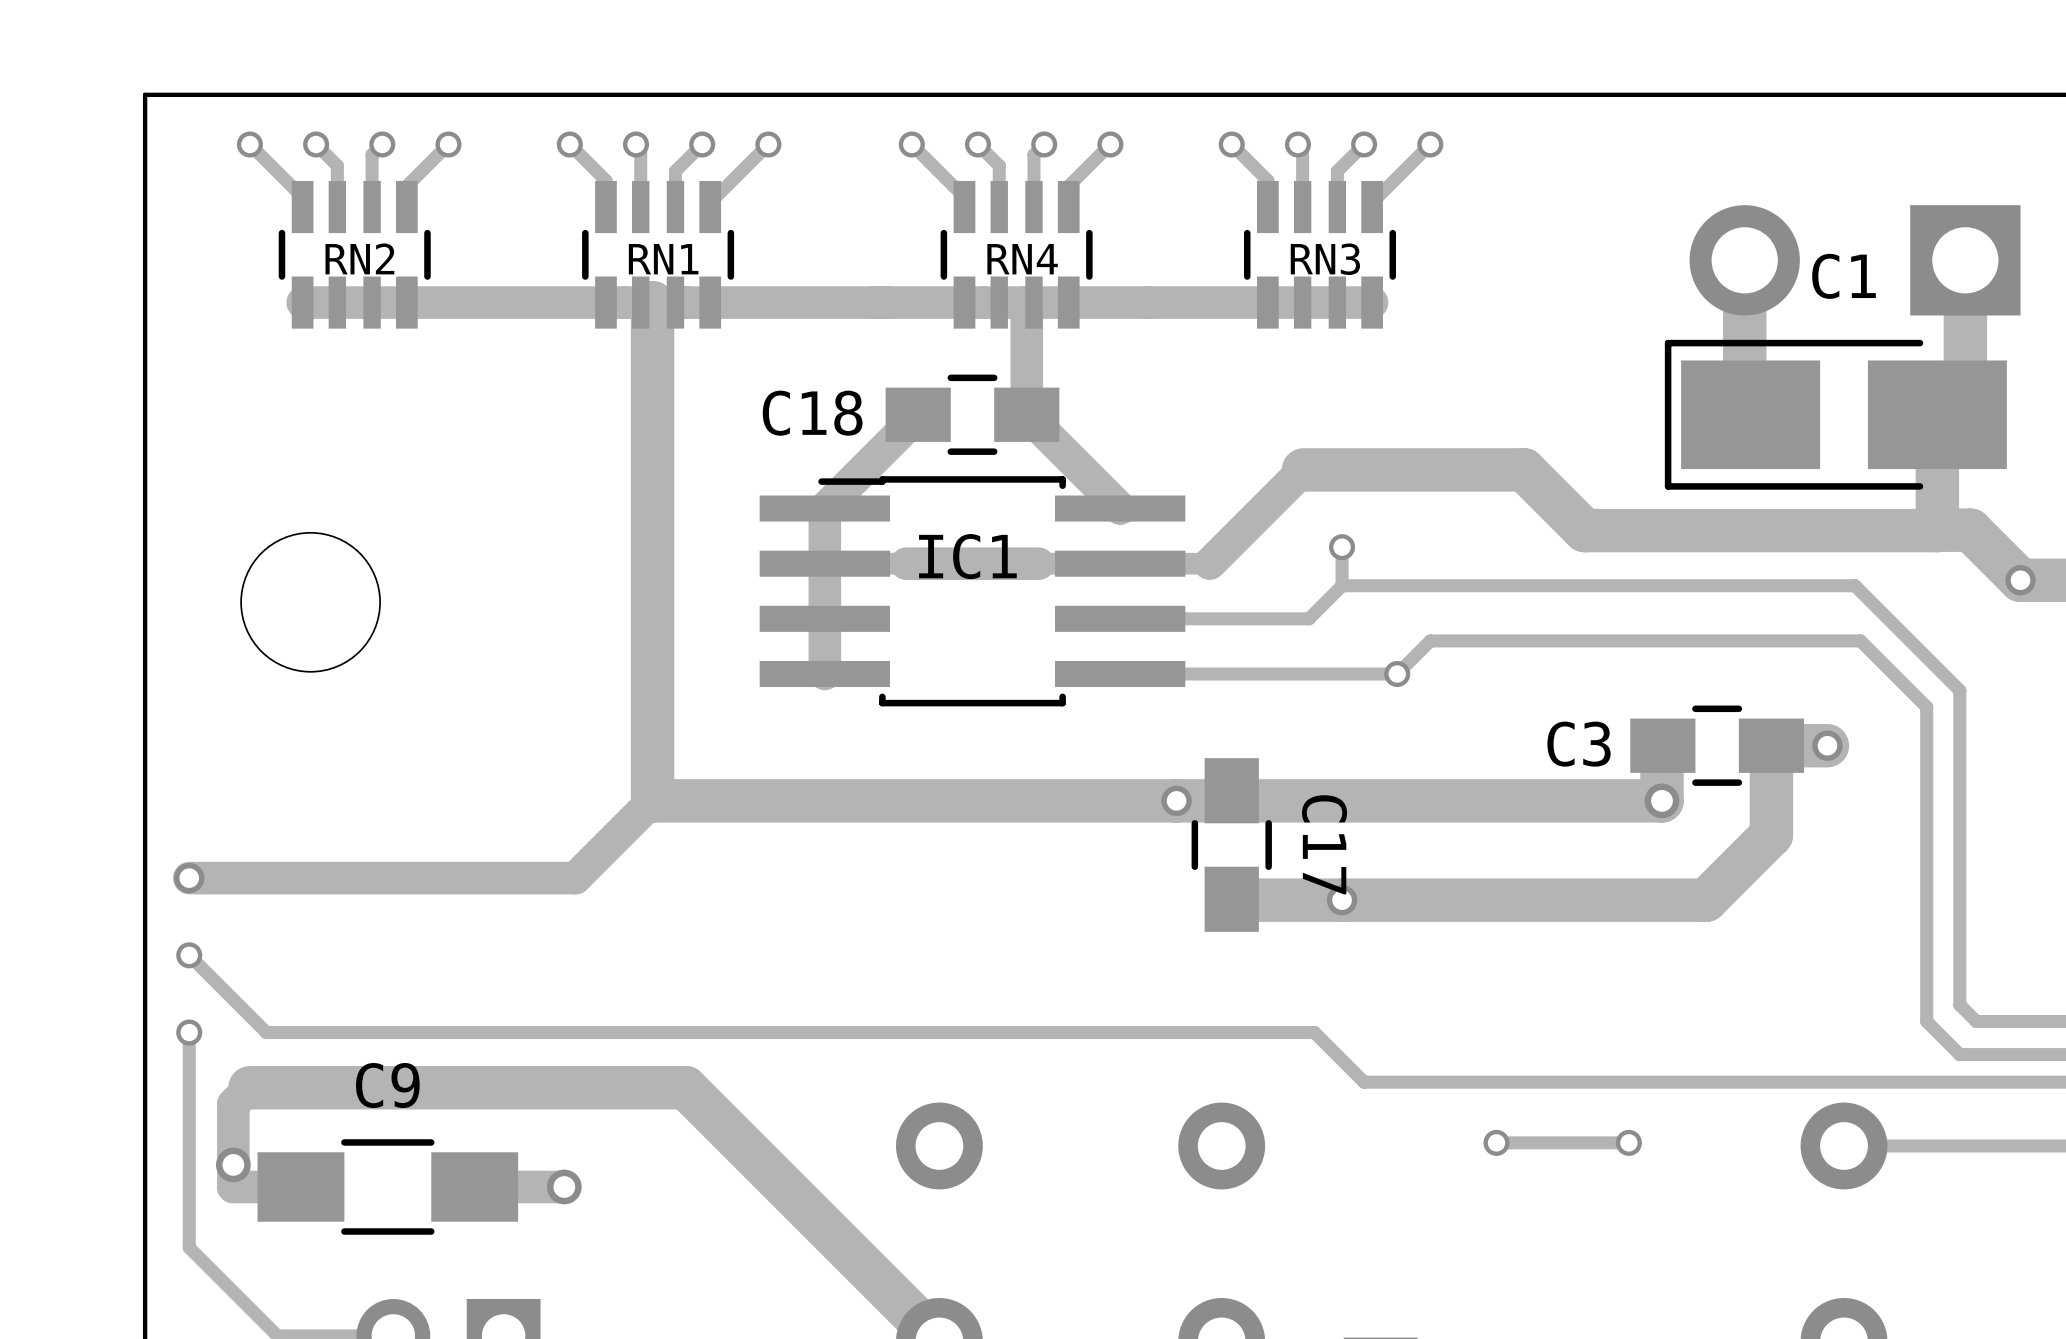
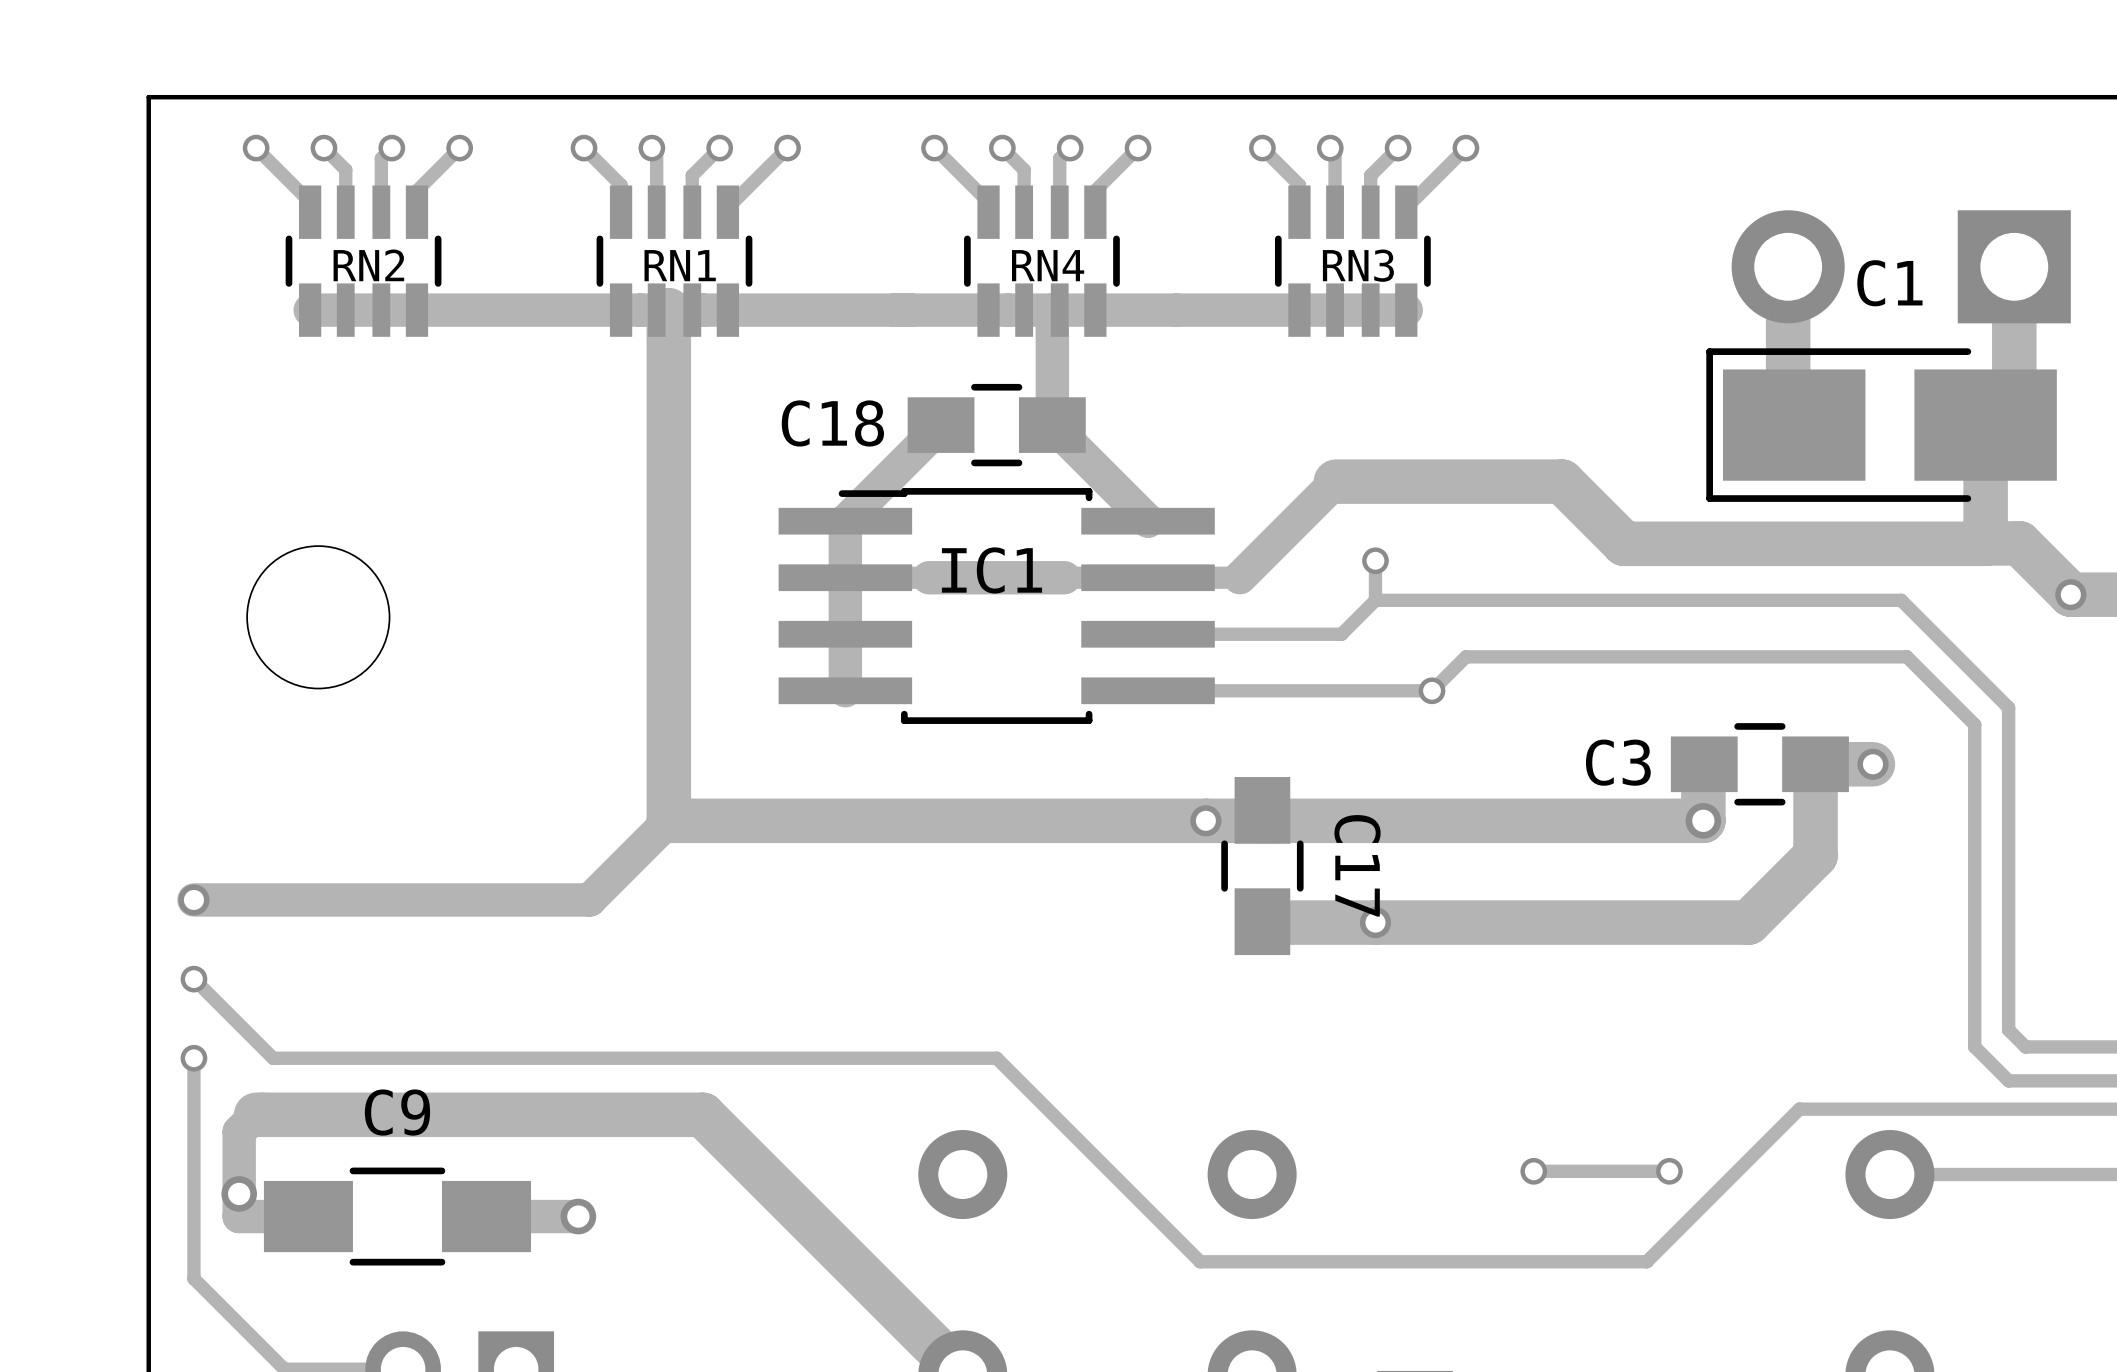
track: (972, 1032) (1314, 1032) (1364, 1082) (1755, 1082) -> (996, 1058) (1200, 1261) (1646, 1261) (1799, 1109)

